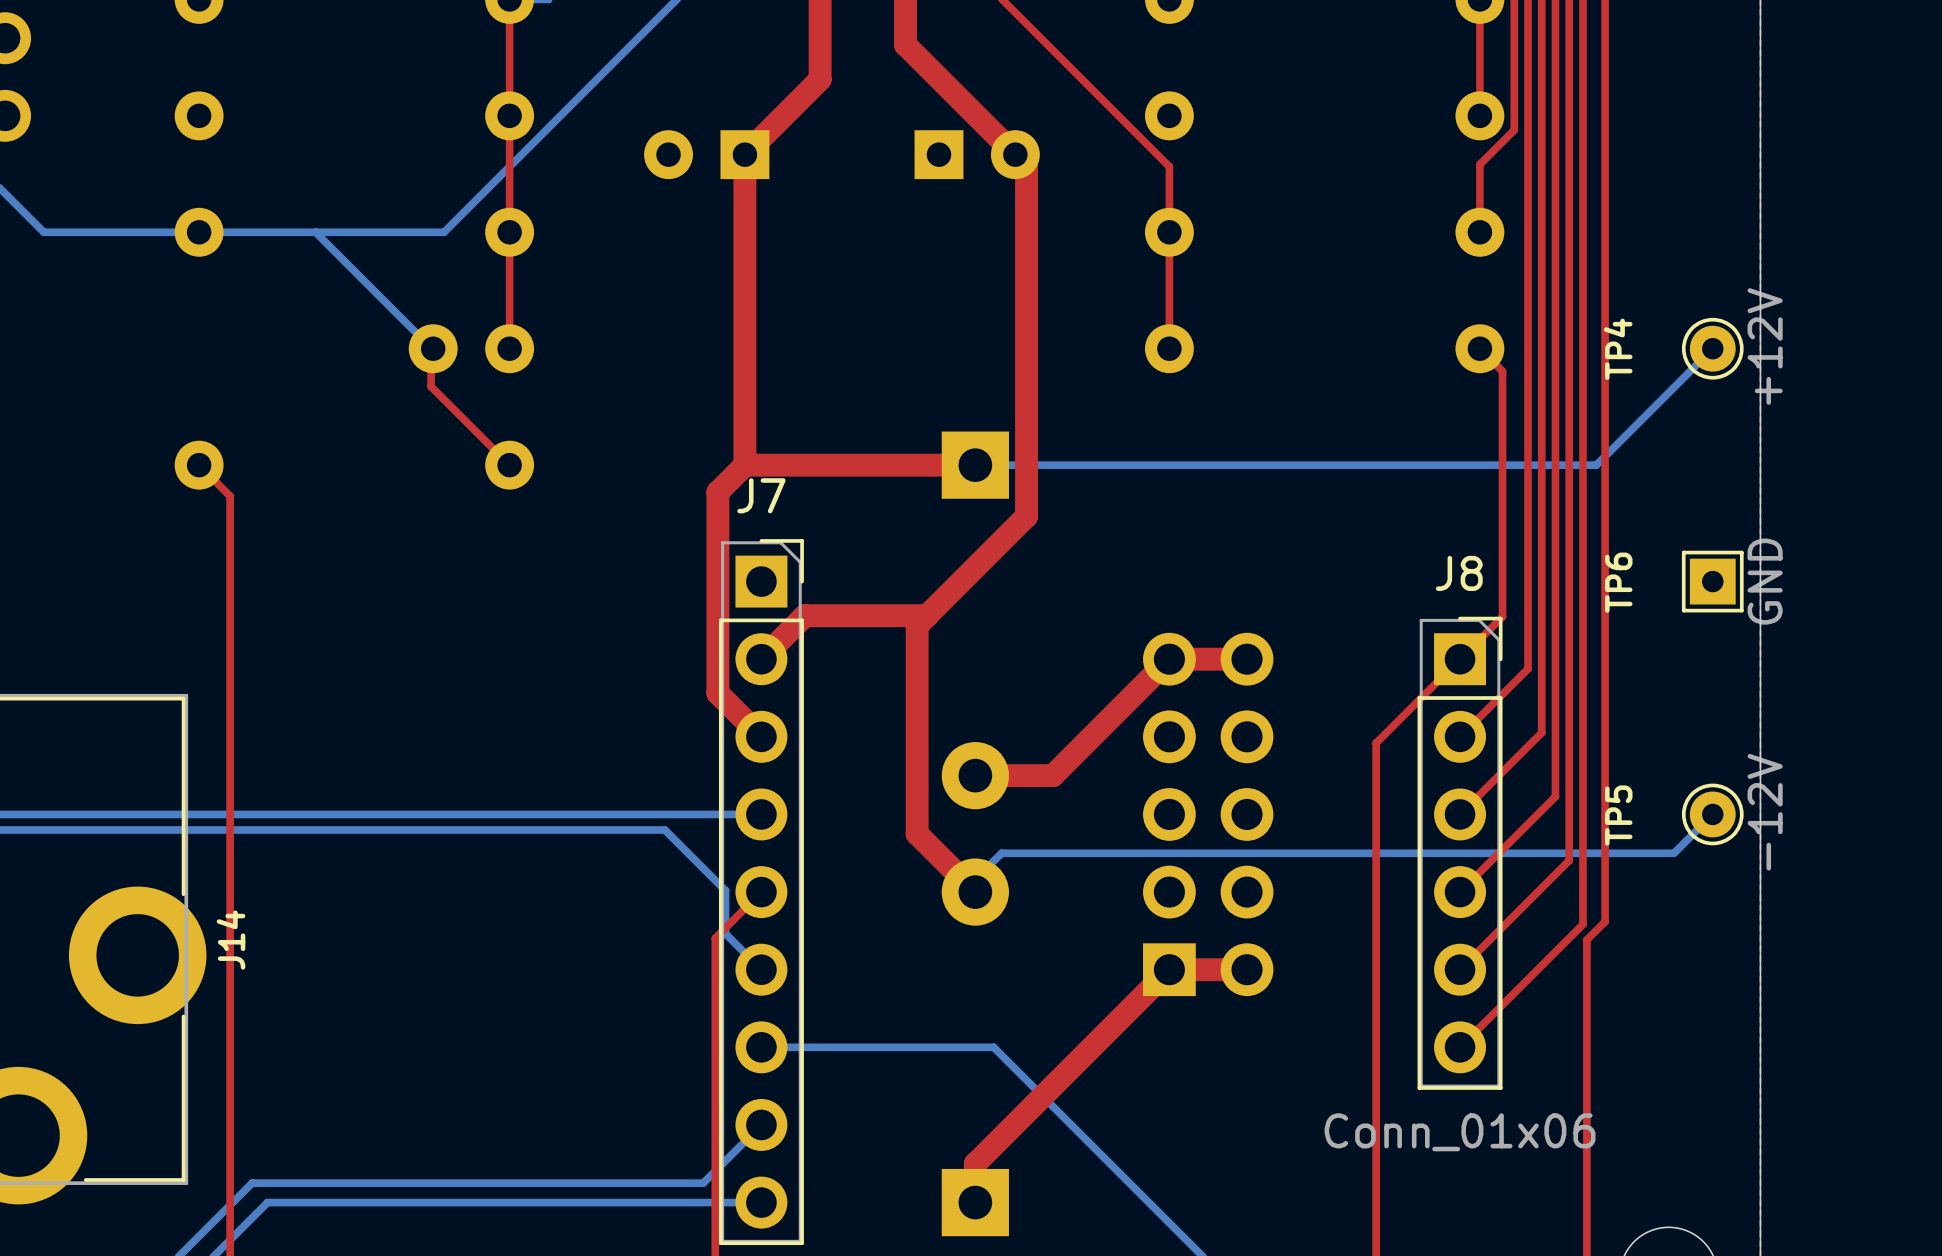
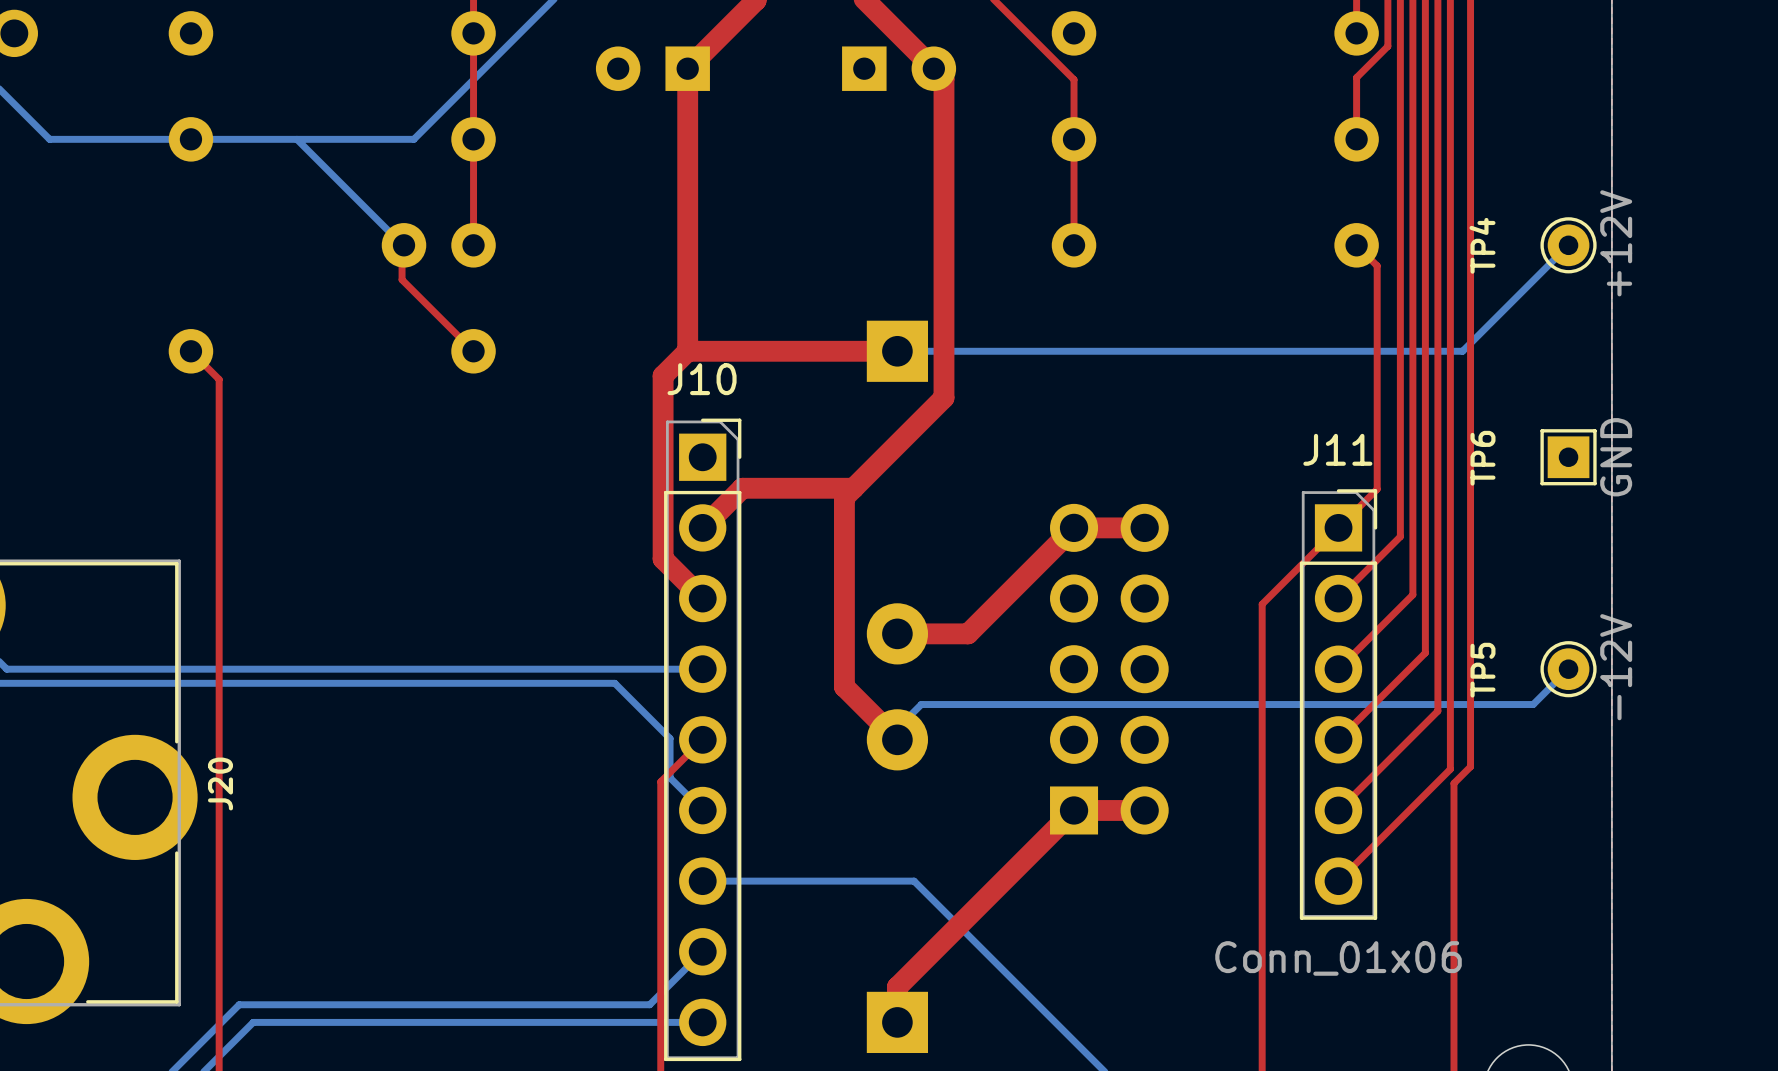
J7 name: J7 (761, 495) -> J10 (702, 379)
J8 name: J8 (1459, 573) -> J11 (1337, 449)
J14 name: J14 (231, 940) -> J20 (220, 783)

